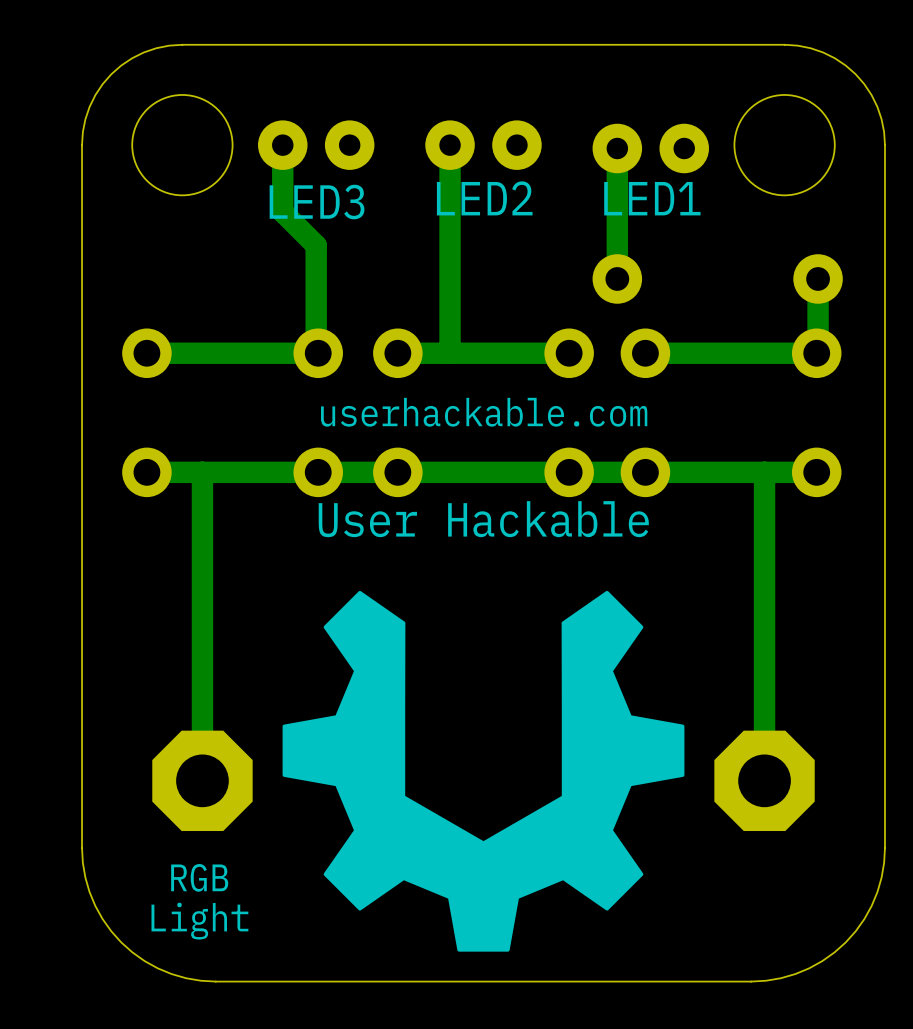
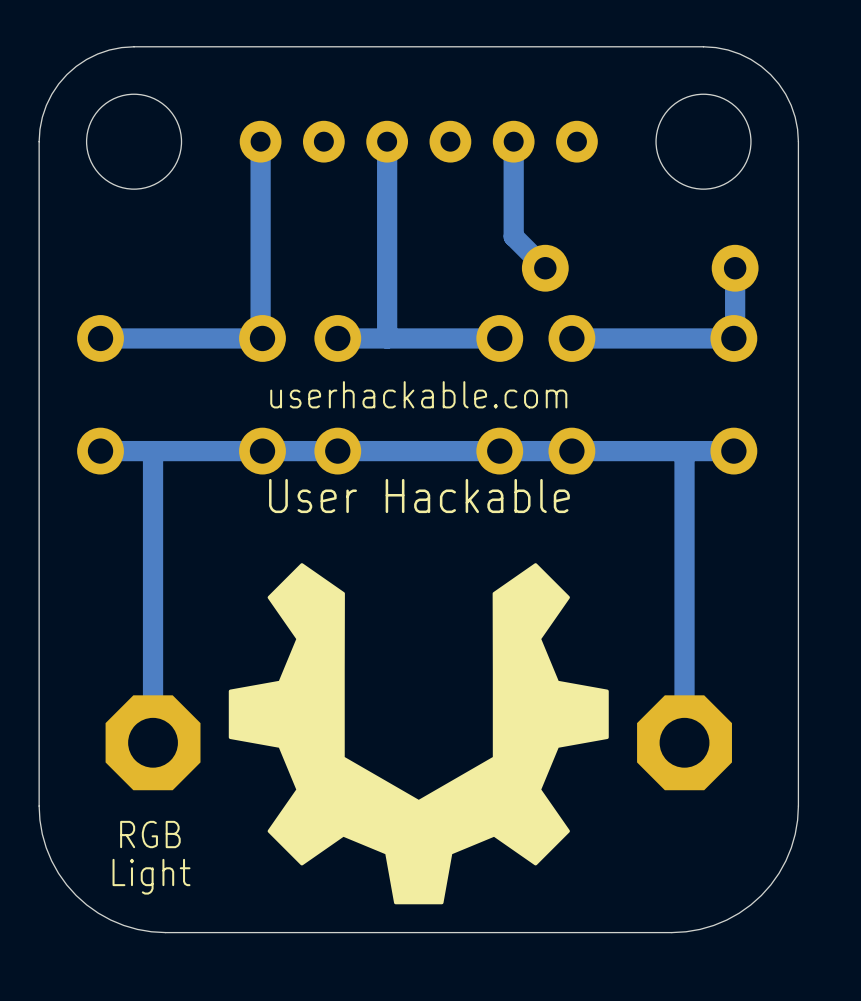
track: (282, 145) (282, 212) (316, 245) -> (260, 141) (260, 236)
LED3: (316, 145) -> none
part: none -> (292, 141)
LED2: (483, 145) -> none
part: none -> (418, 141)
part: none -> (545, 141)
track: (617, 148) (617, 278) -> (513, 141) (513, 236) (545, 268)
LED1: (650, 148) -> none

